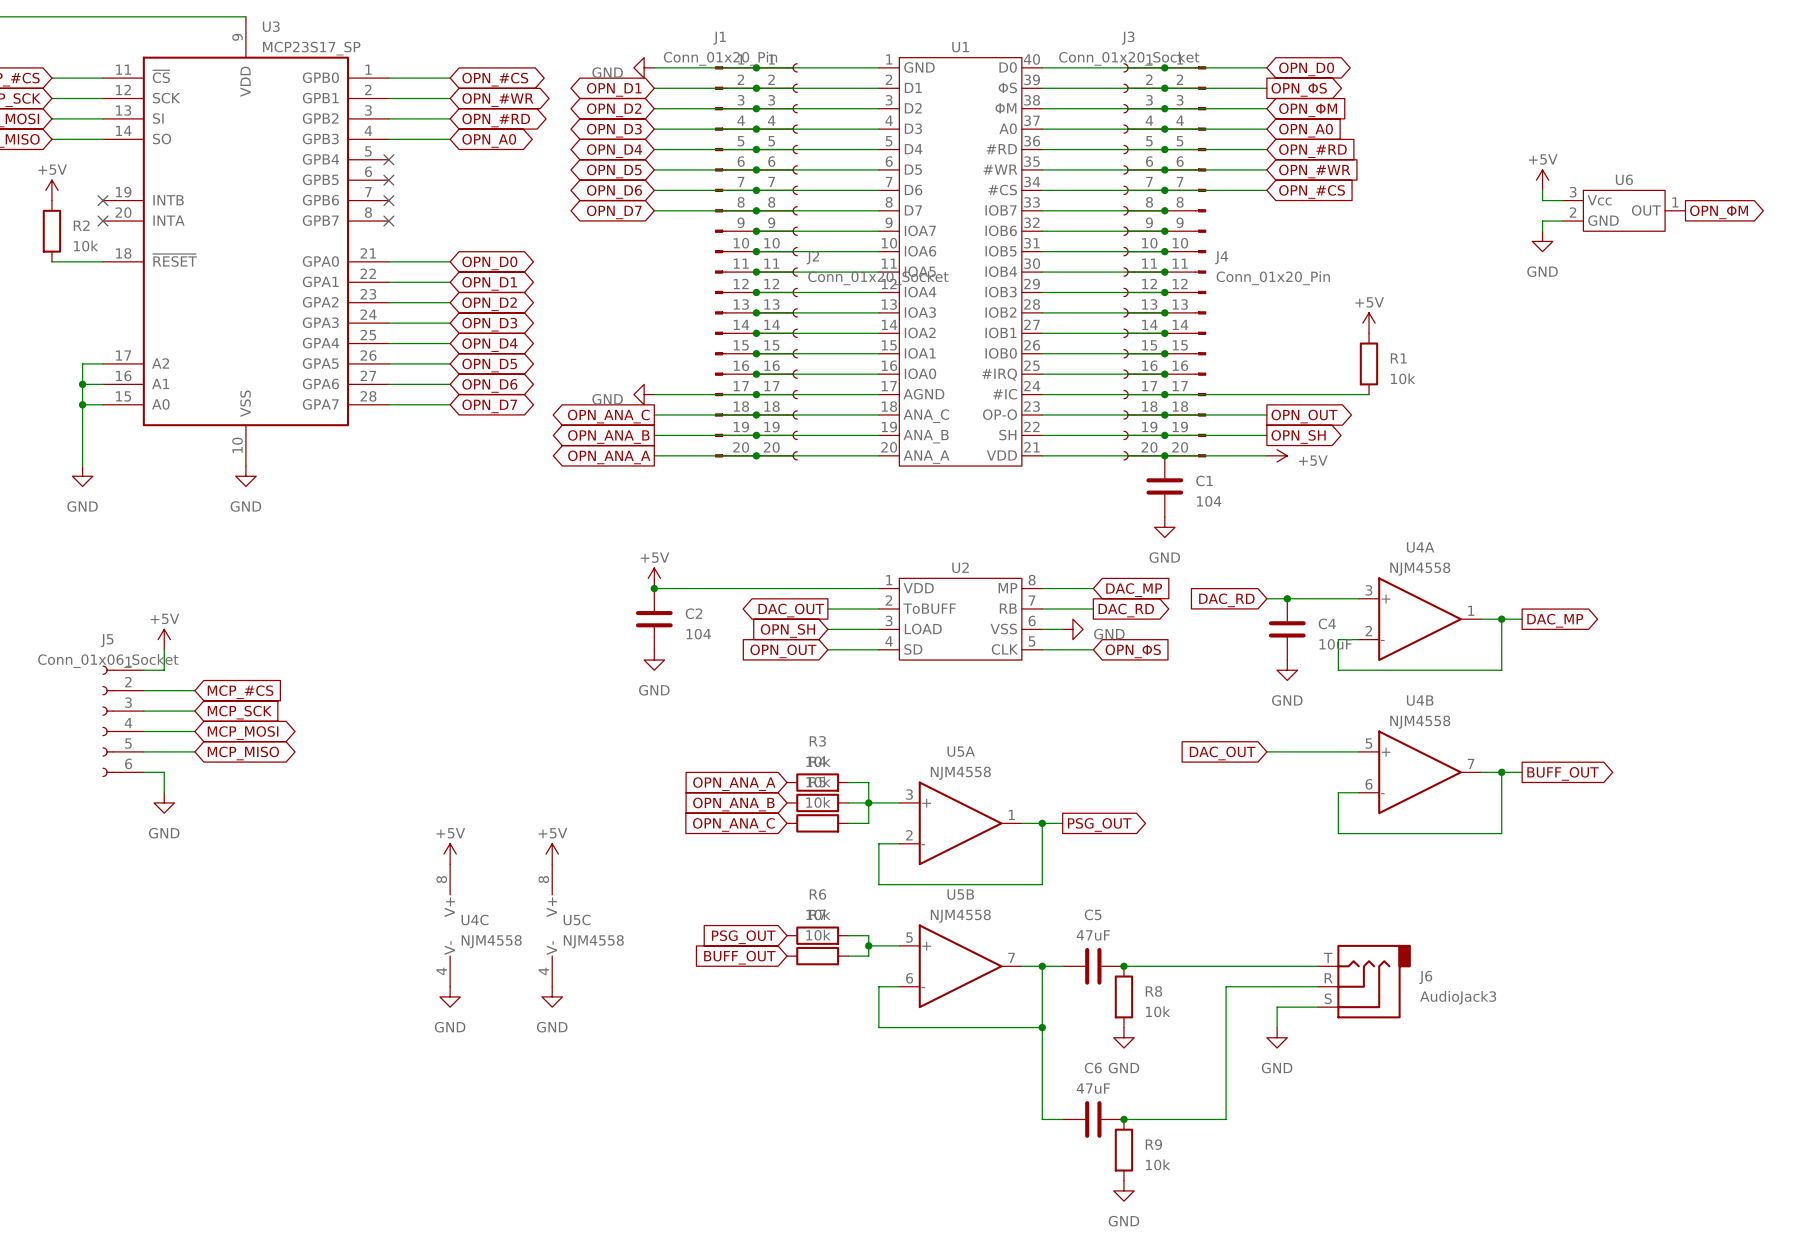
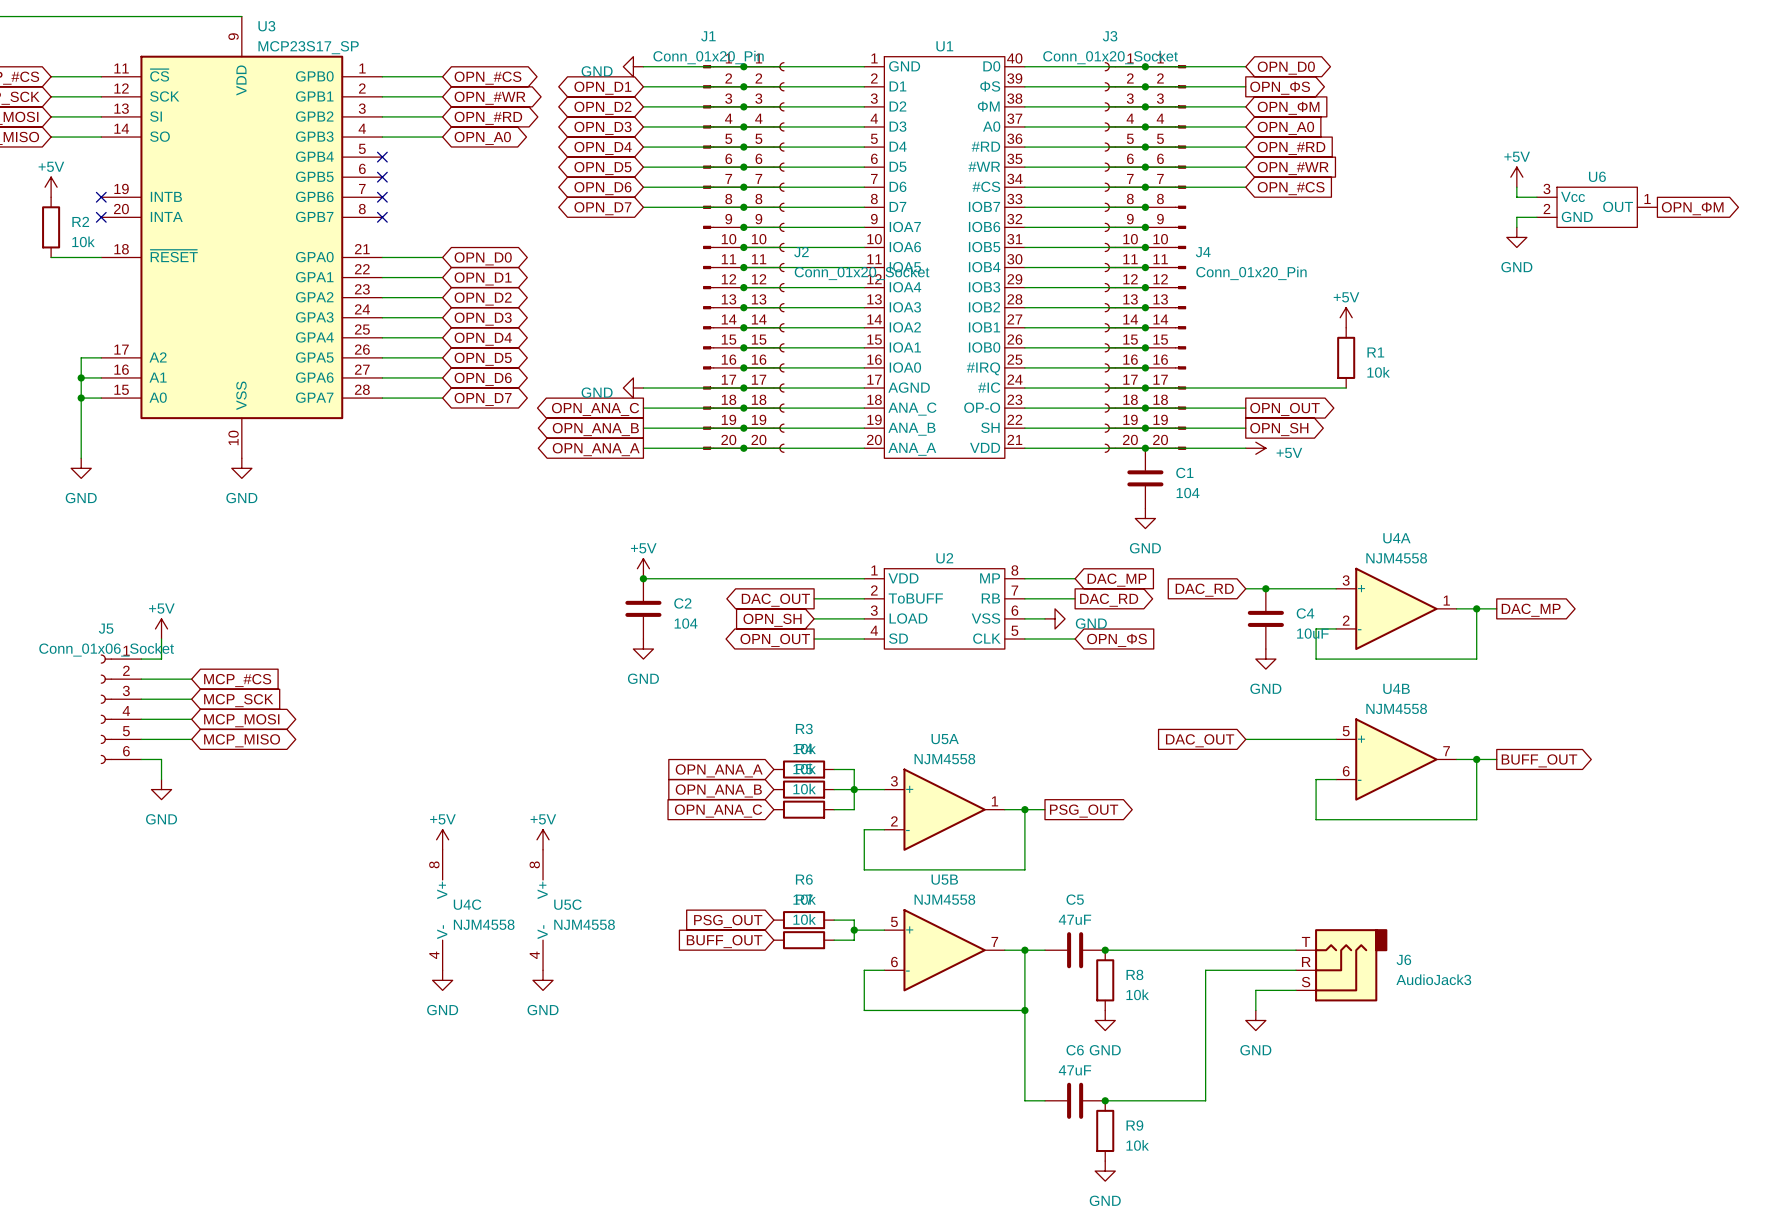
global label shape: input (783, 651) -> output (775, 640)

